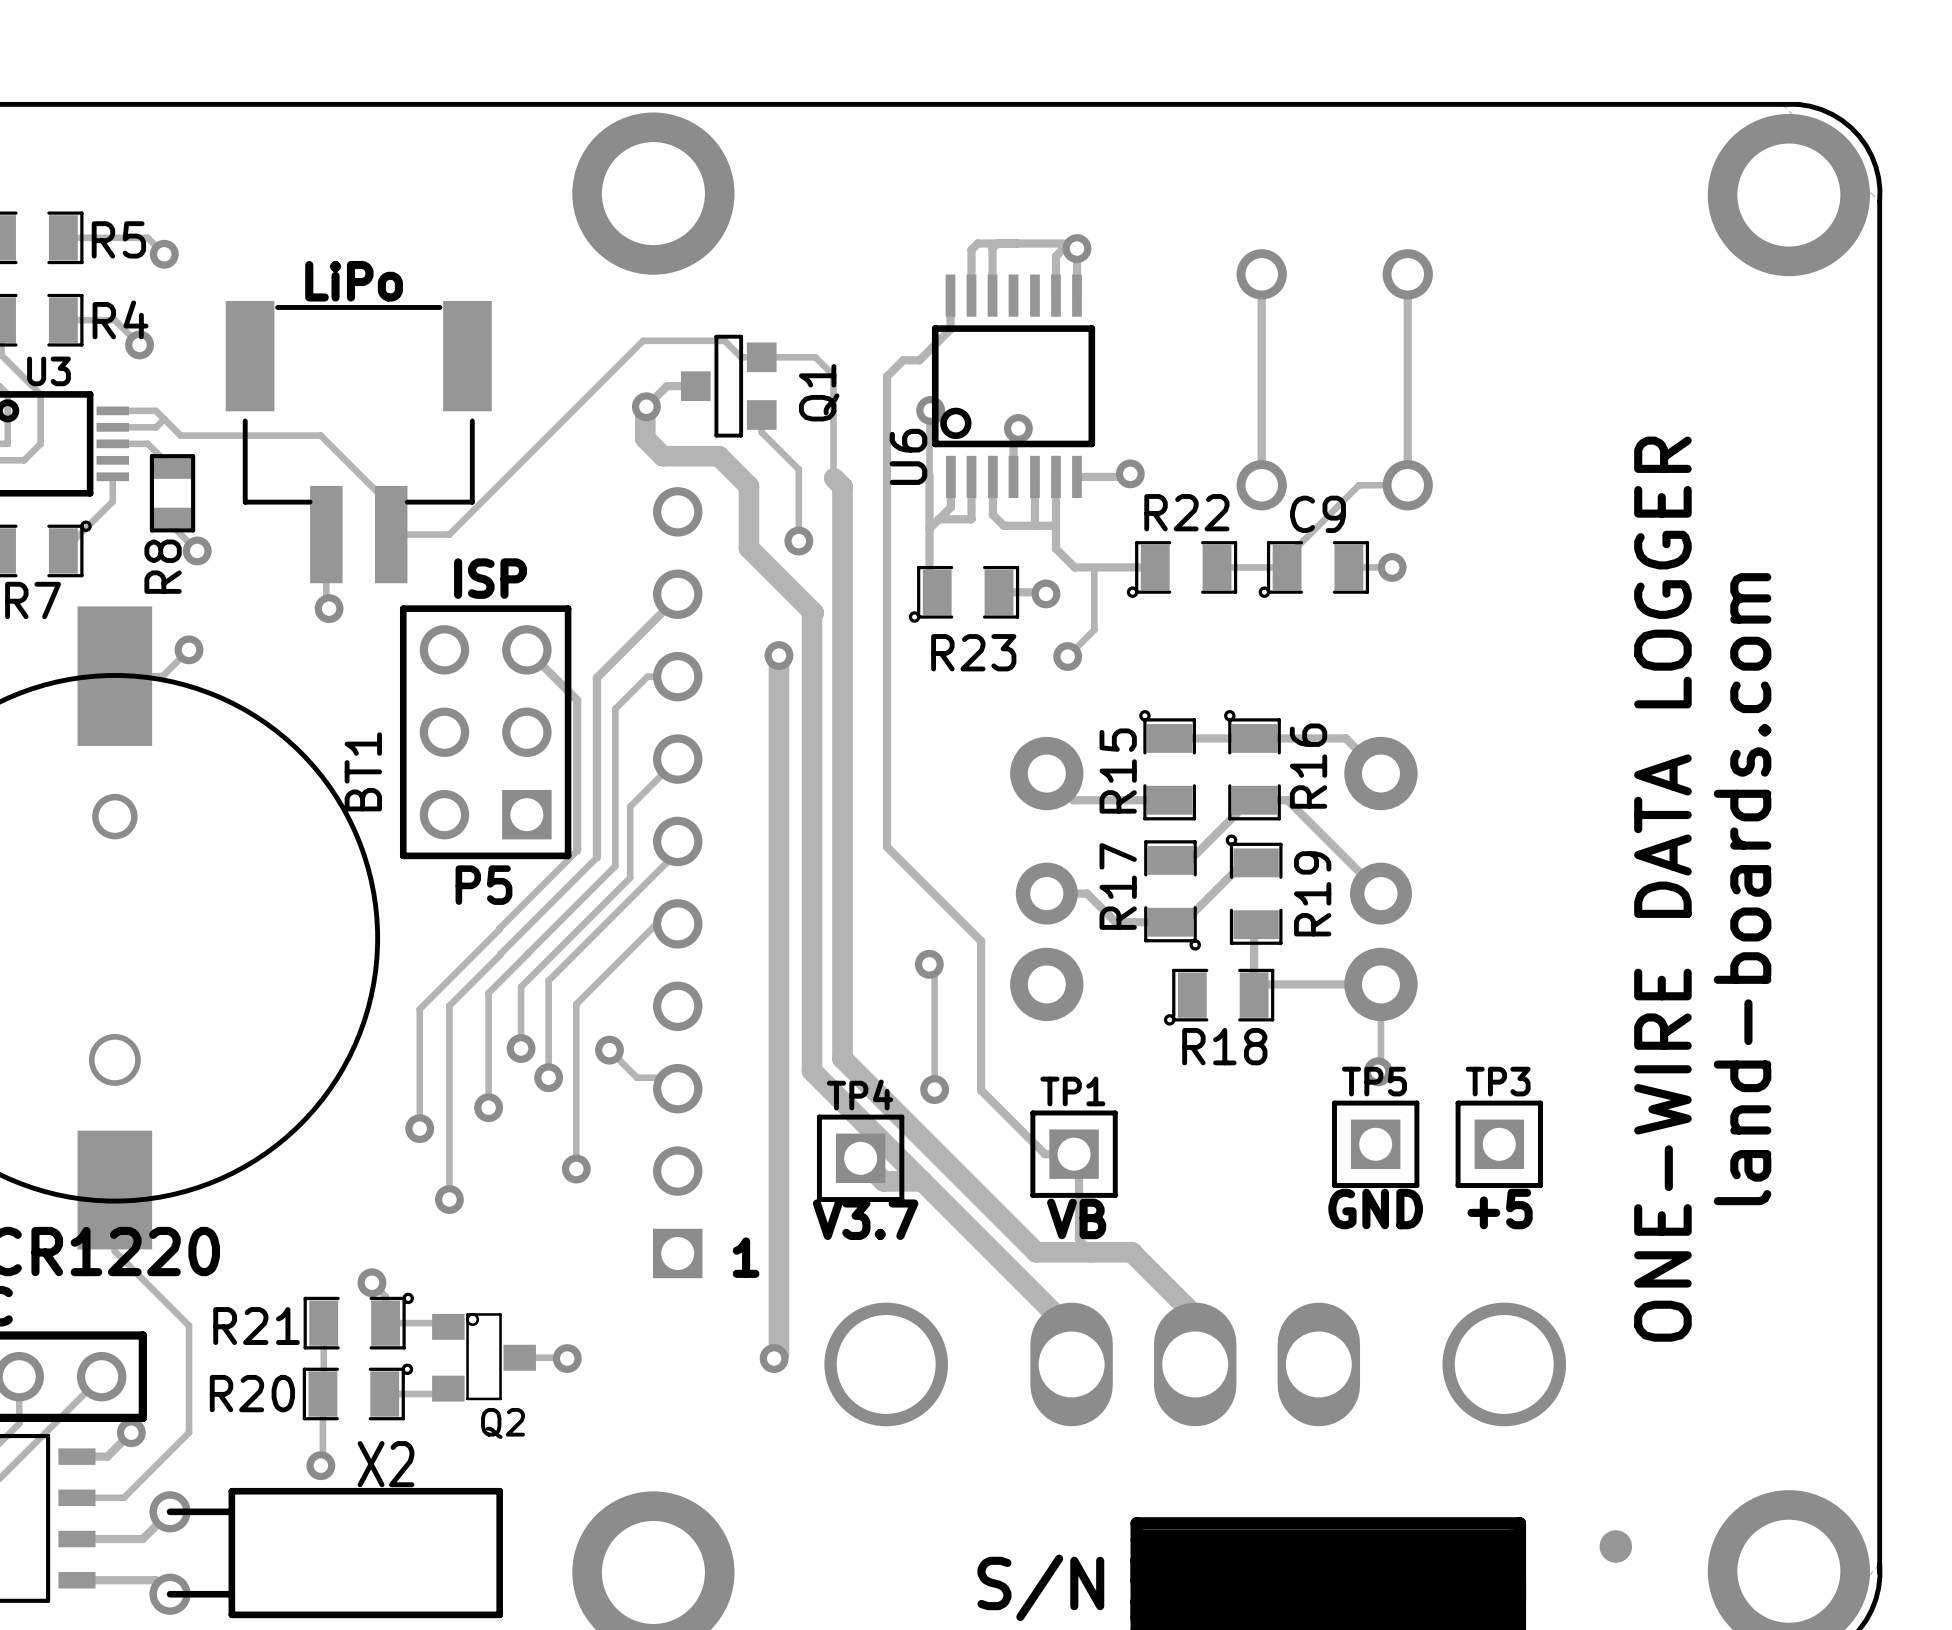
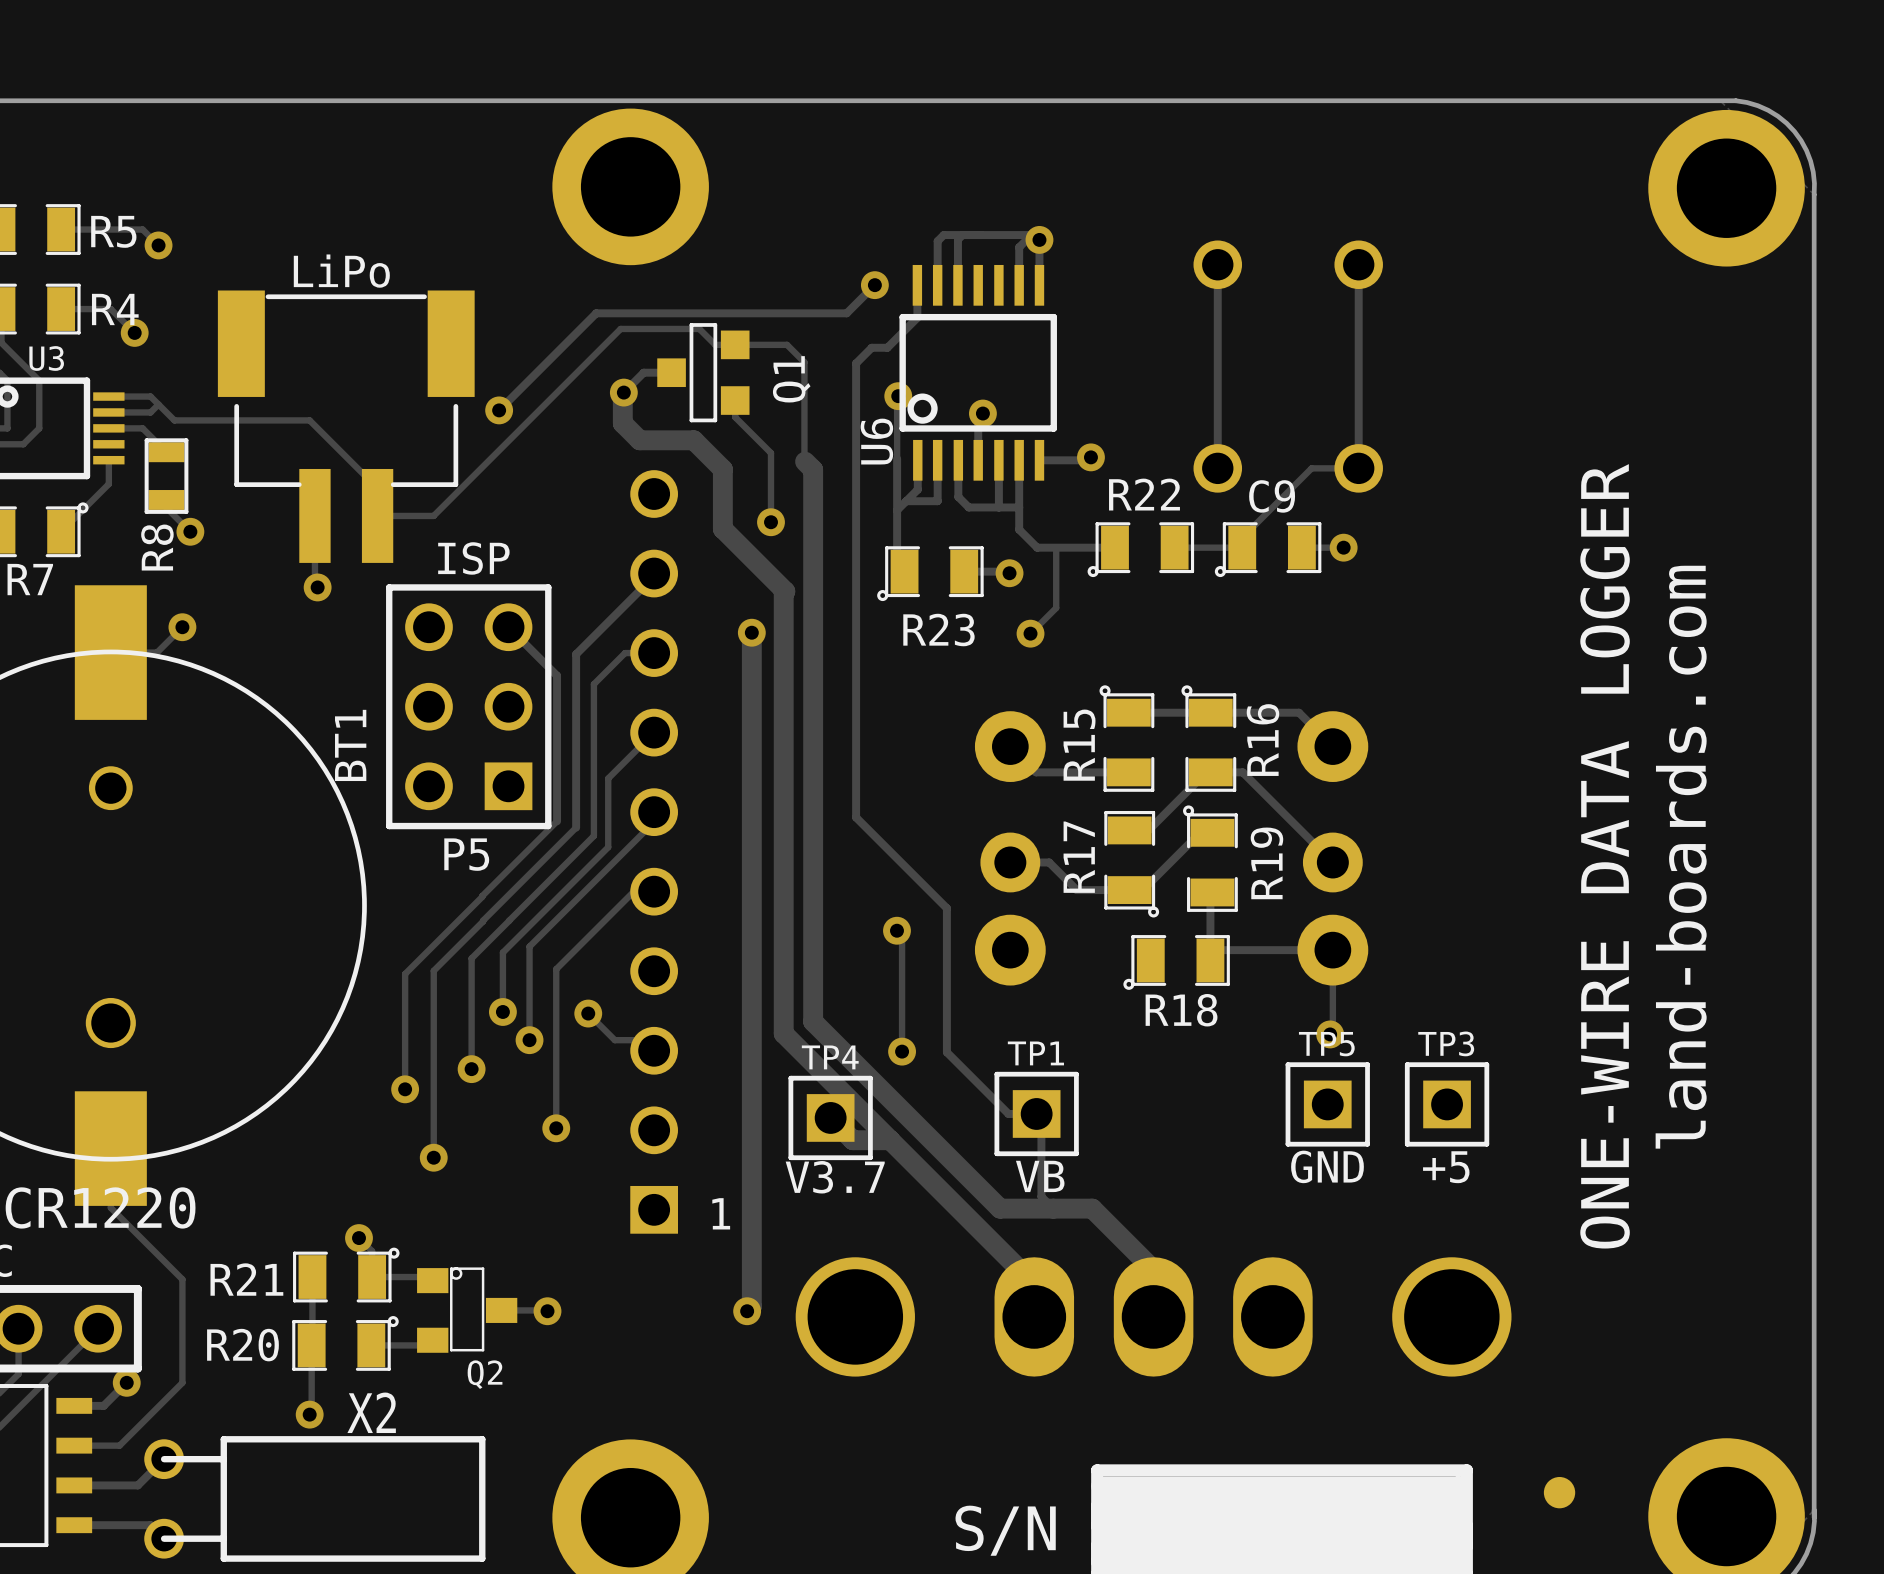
track: none -> (874, 285) (846, 313) (596, 313) (499, 410)
via: none -> (874, 285)
via: none -> (499, 410)

